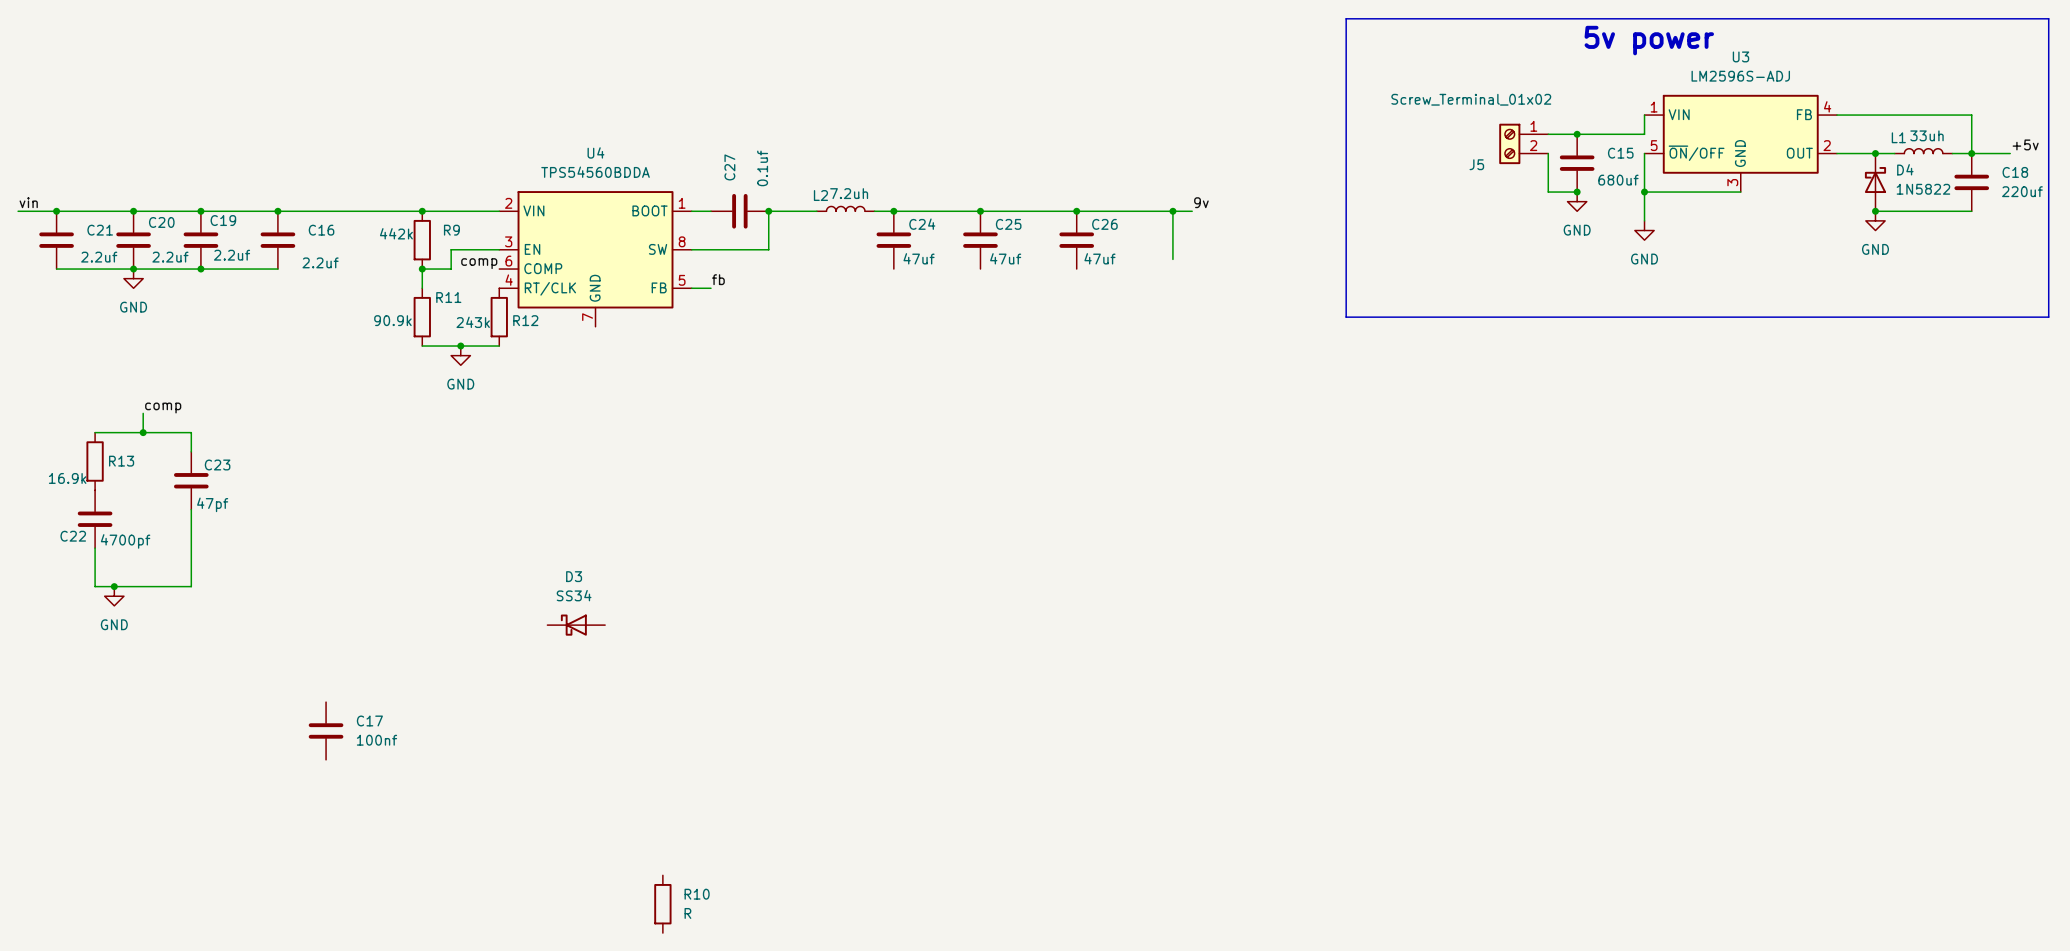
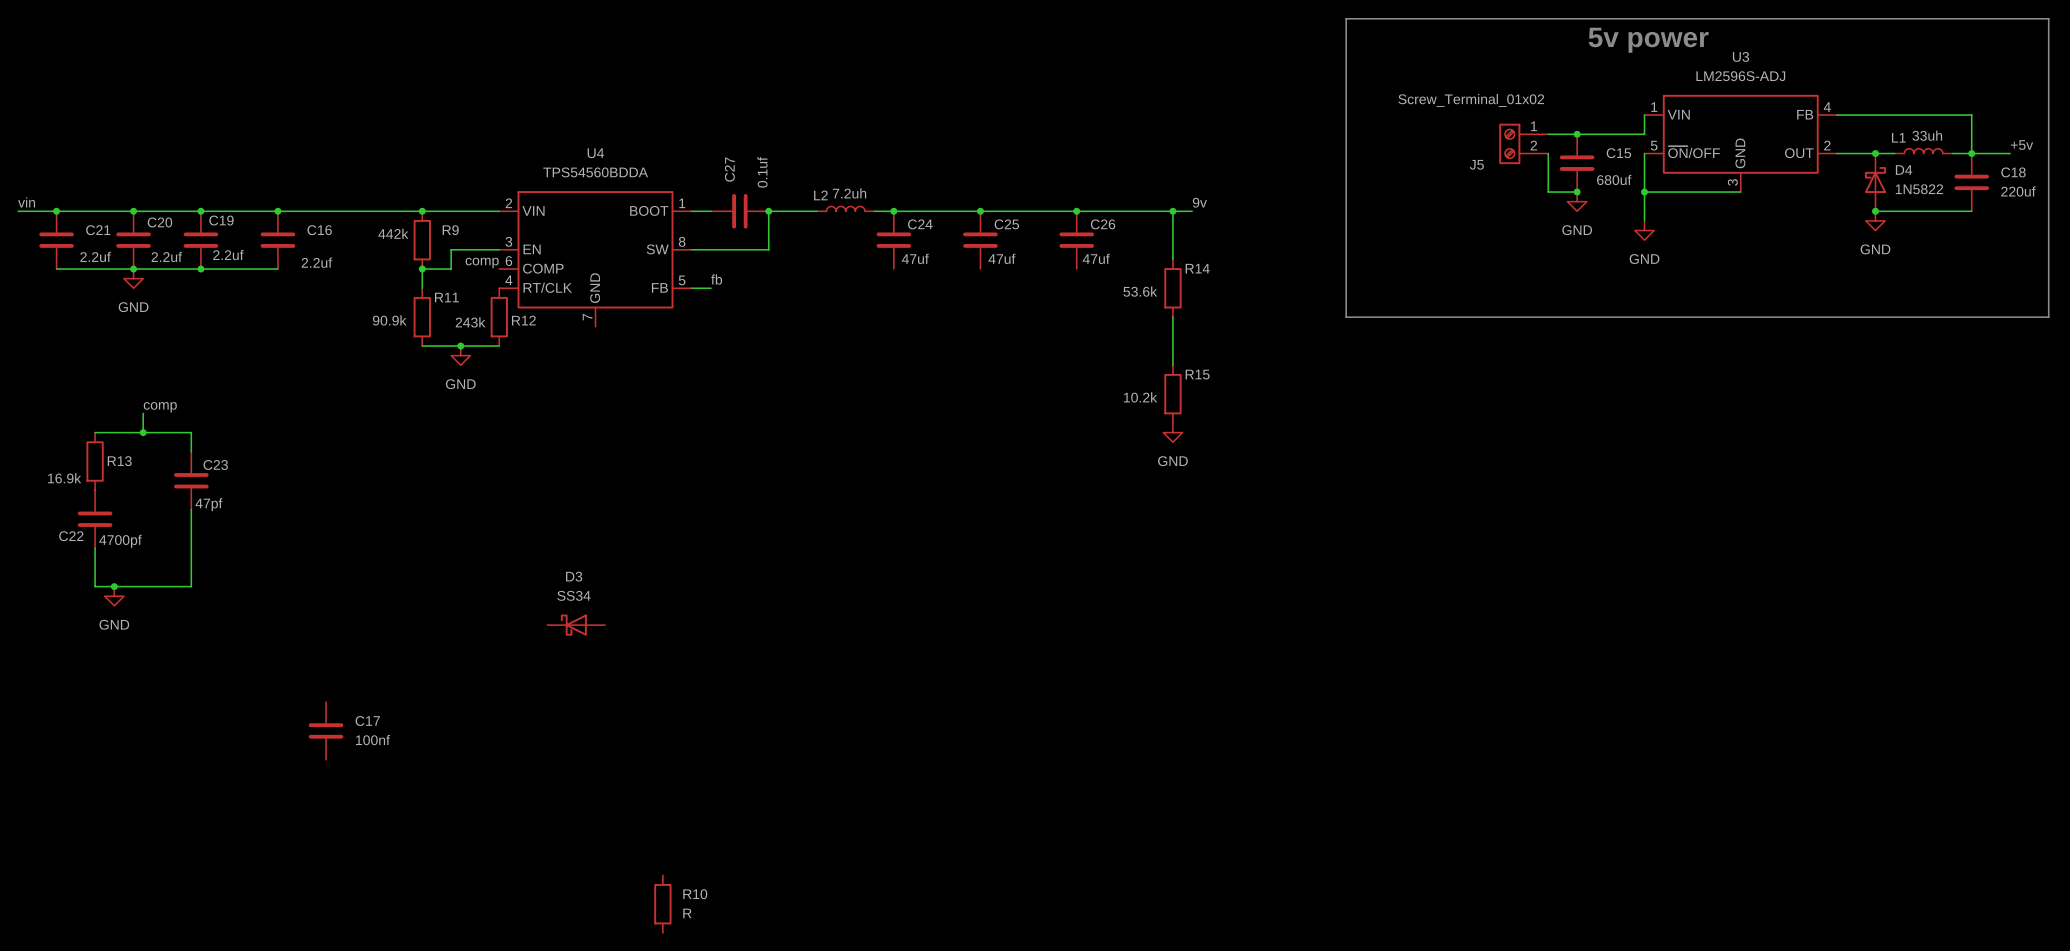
R14: none -> 53.6k (1172, 288)
wire: none -> (1172, 317) (1172, 365)
R15: none -> 10.2k (1172, 394)
power symbol: none -> GND (1172, 432)

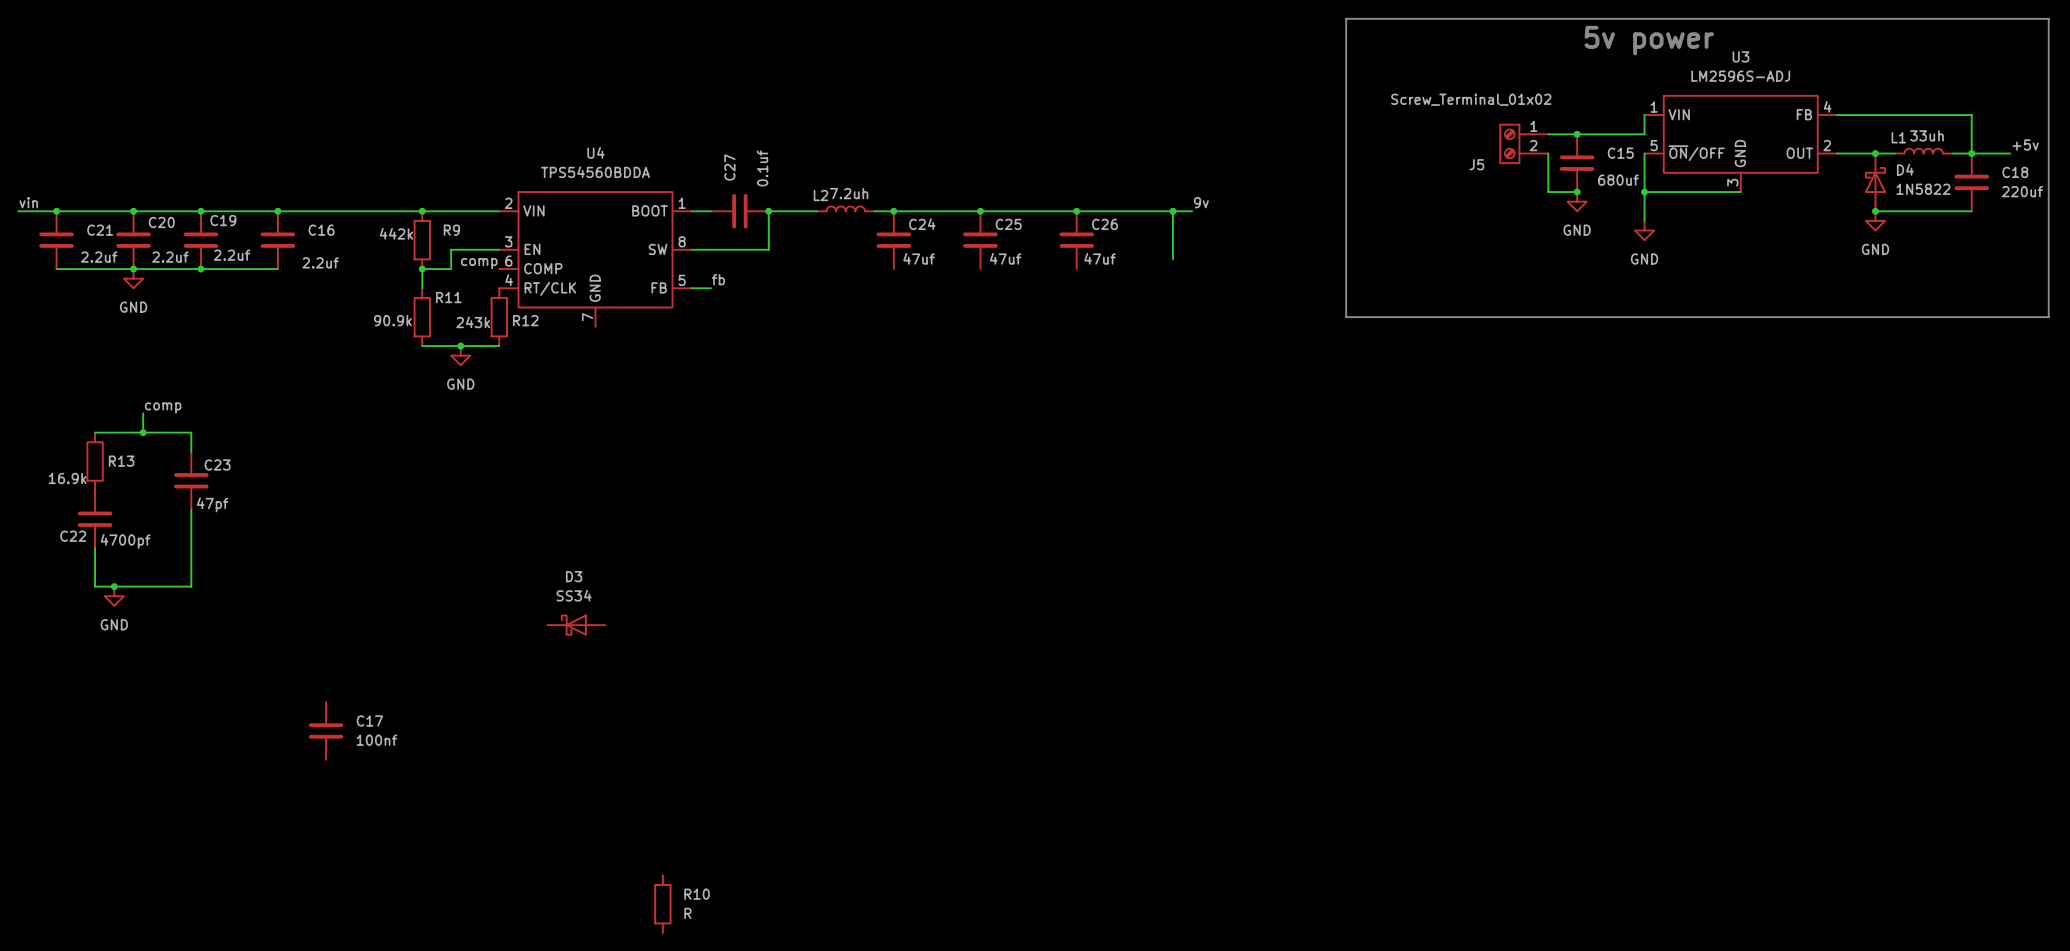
R14: 53.6k (1172, 288) -> none
wire: (1172, 317) (1172, 365) -> none
R15: 10.2k (1172, 394) -> none
power symbol: GND (1172, 432) -> none

